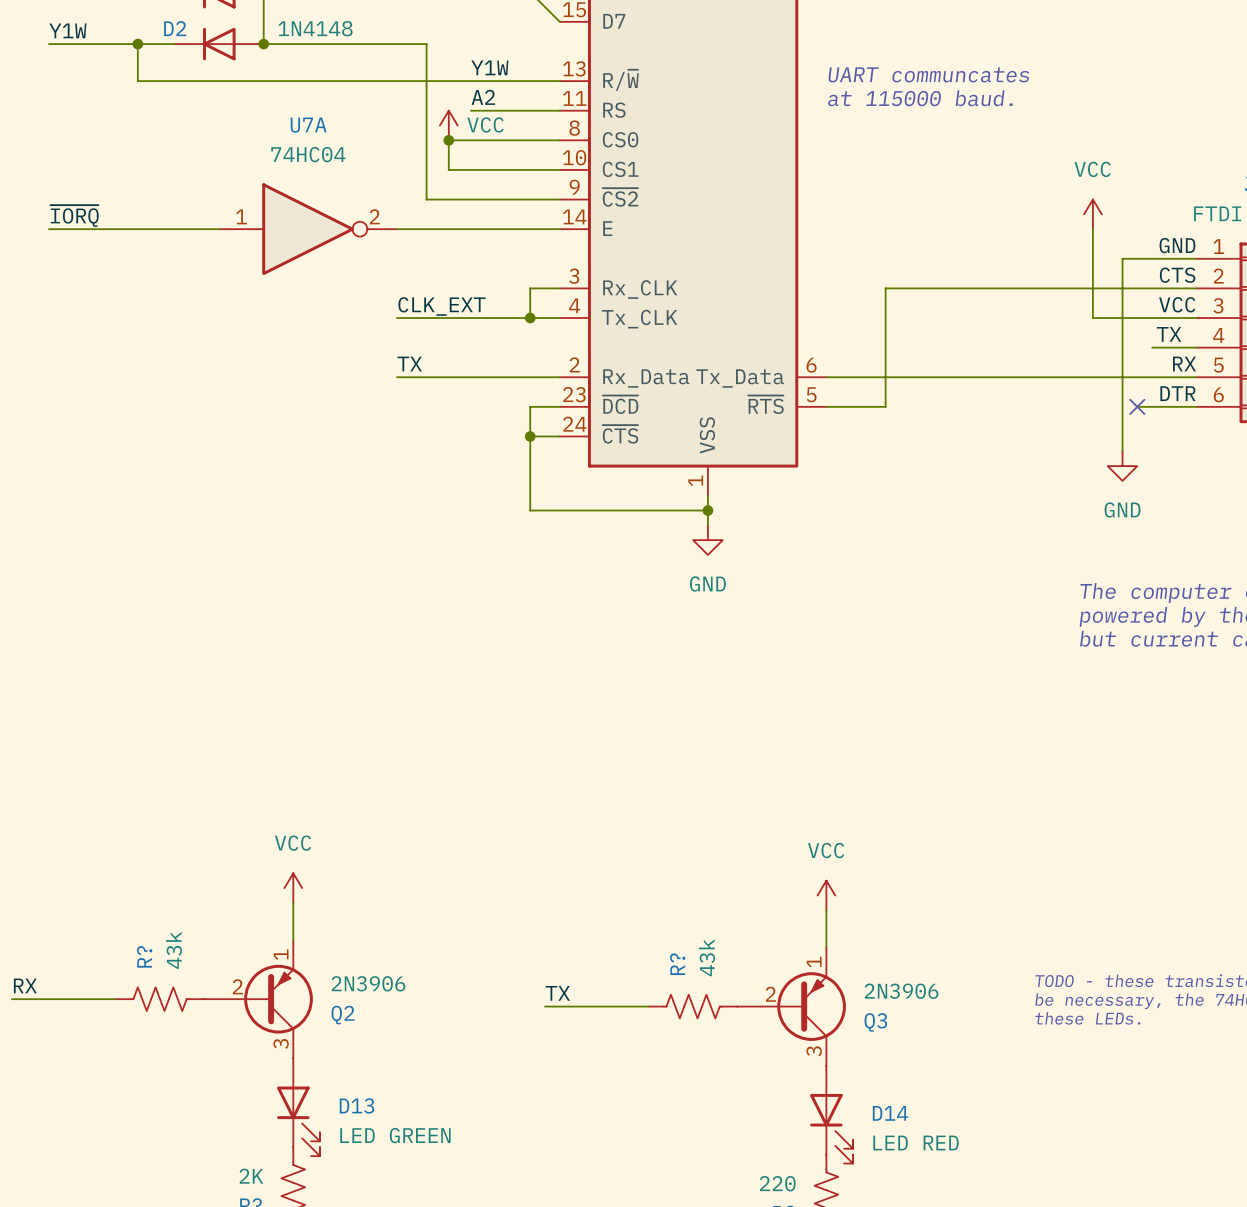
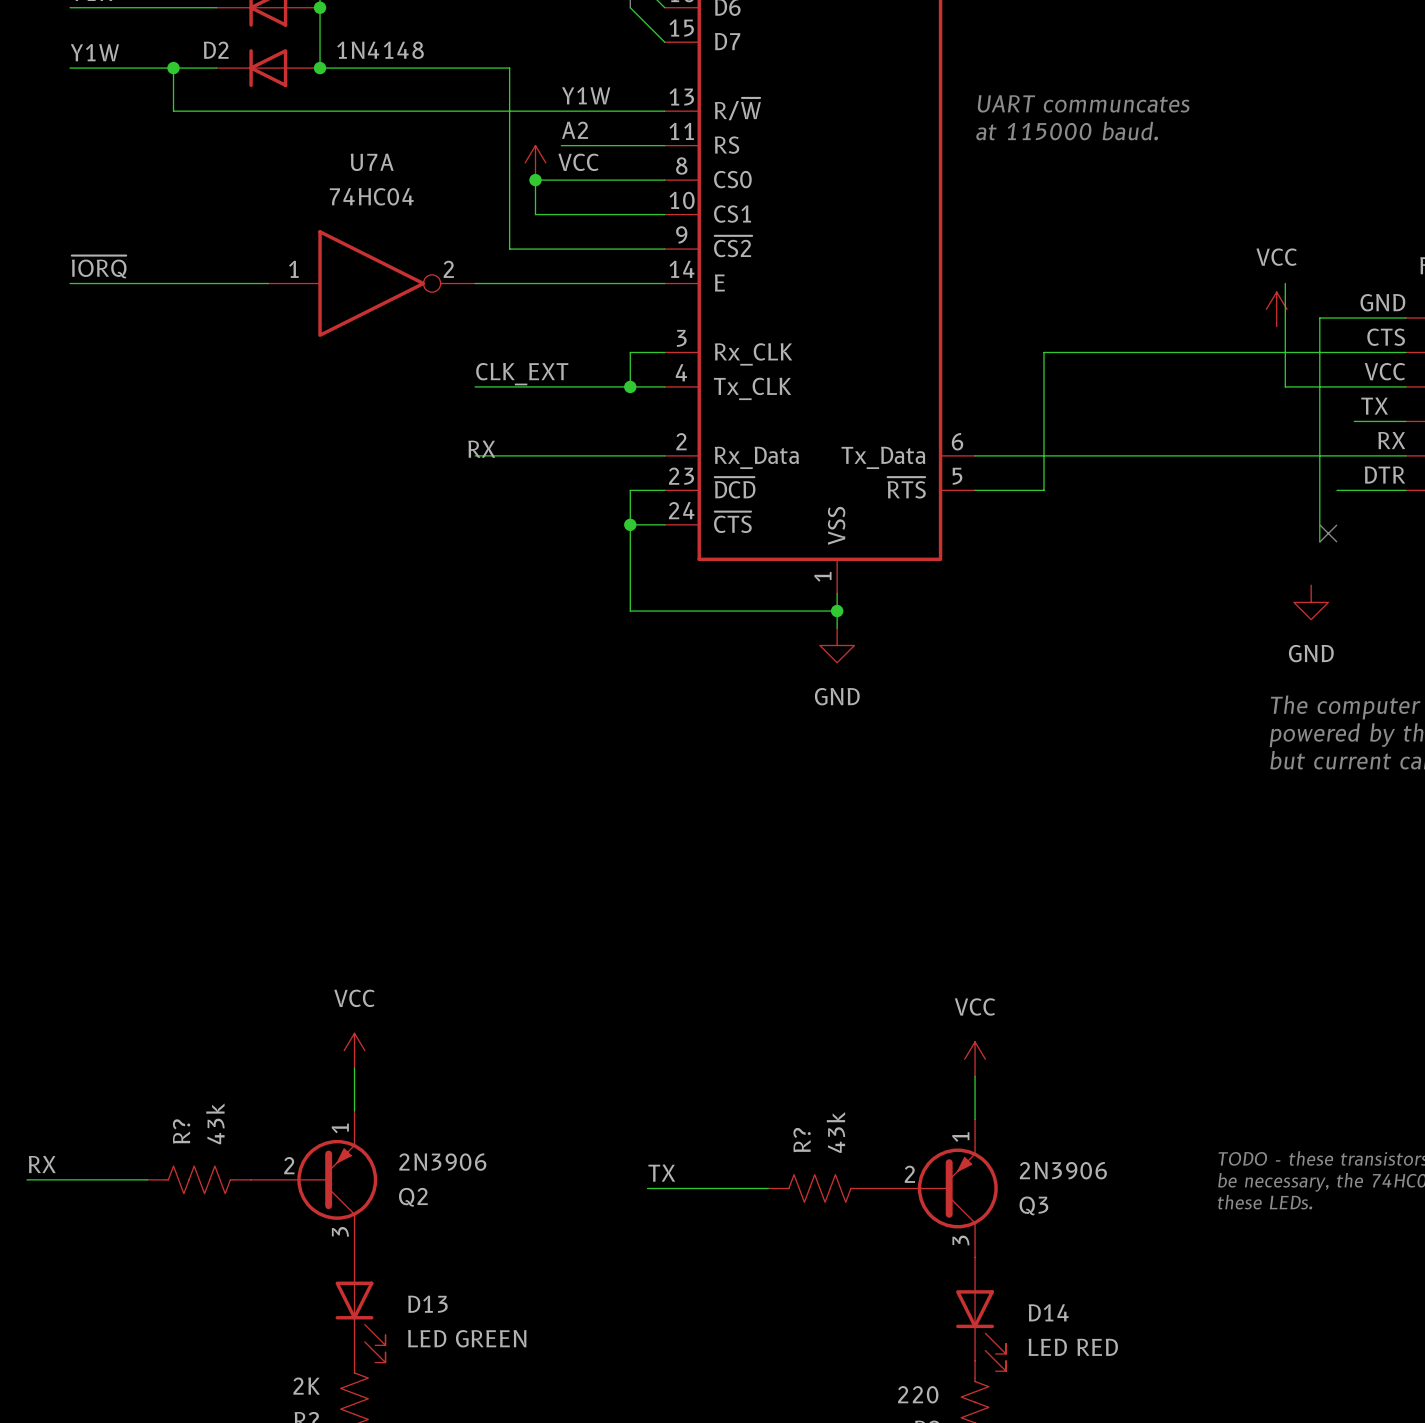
power symbol position: VCC (1092, 214) -> VCC (1276, 309)
label: TX (409, 364) -> RX (481, 449)
no-connect mark position: (1137, 406) -> (1328, 533)
power symbol position: GND (1122, 466) -> GND (1311, 602)

